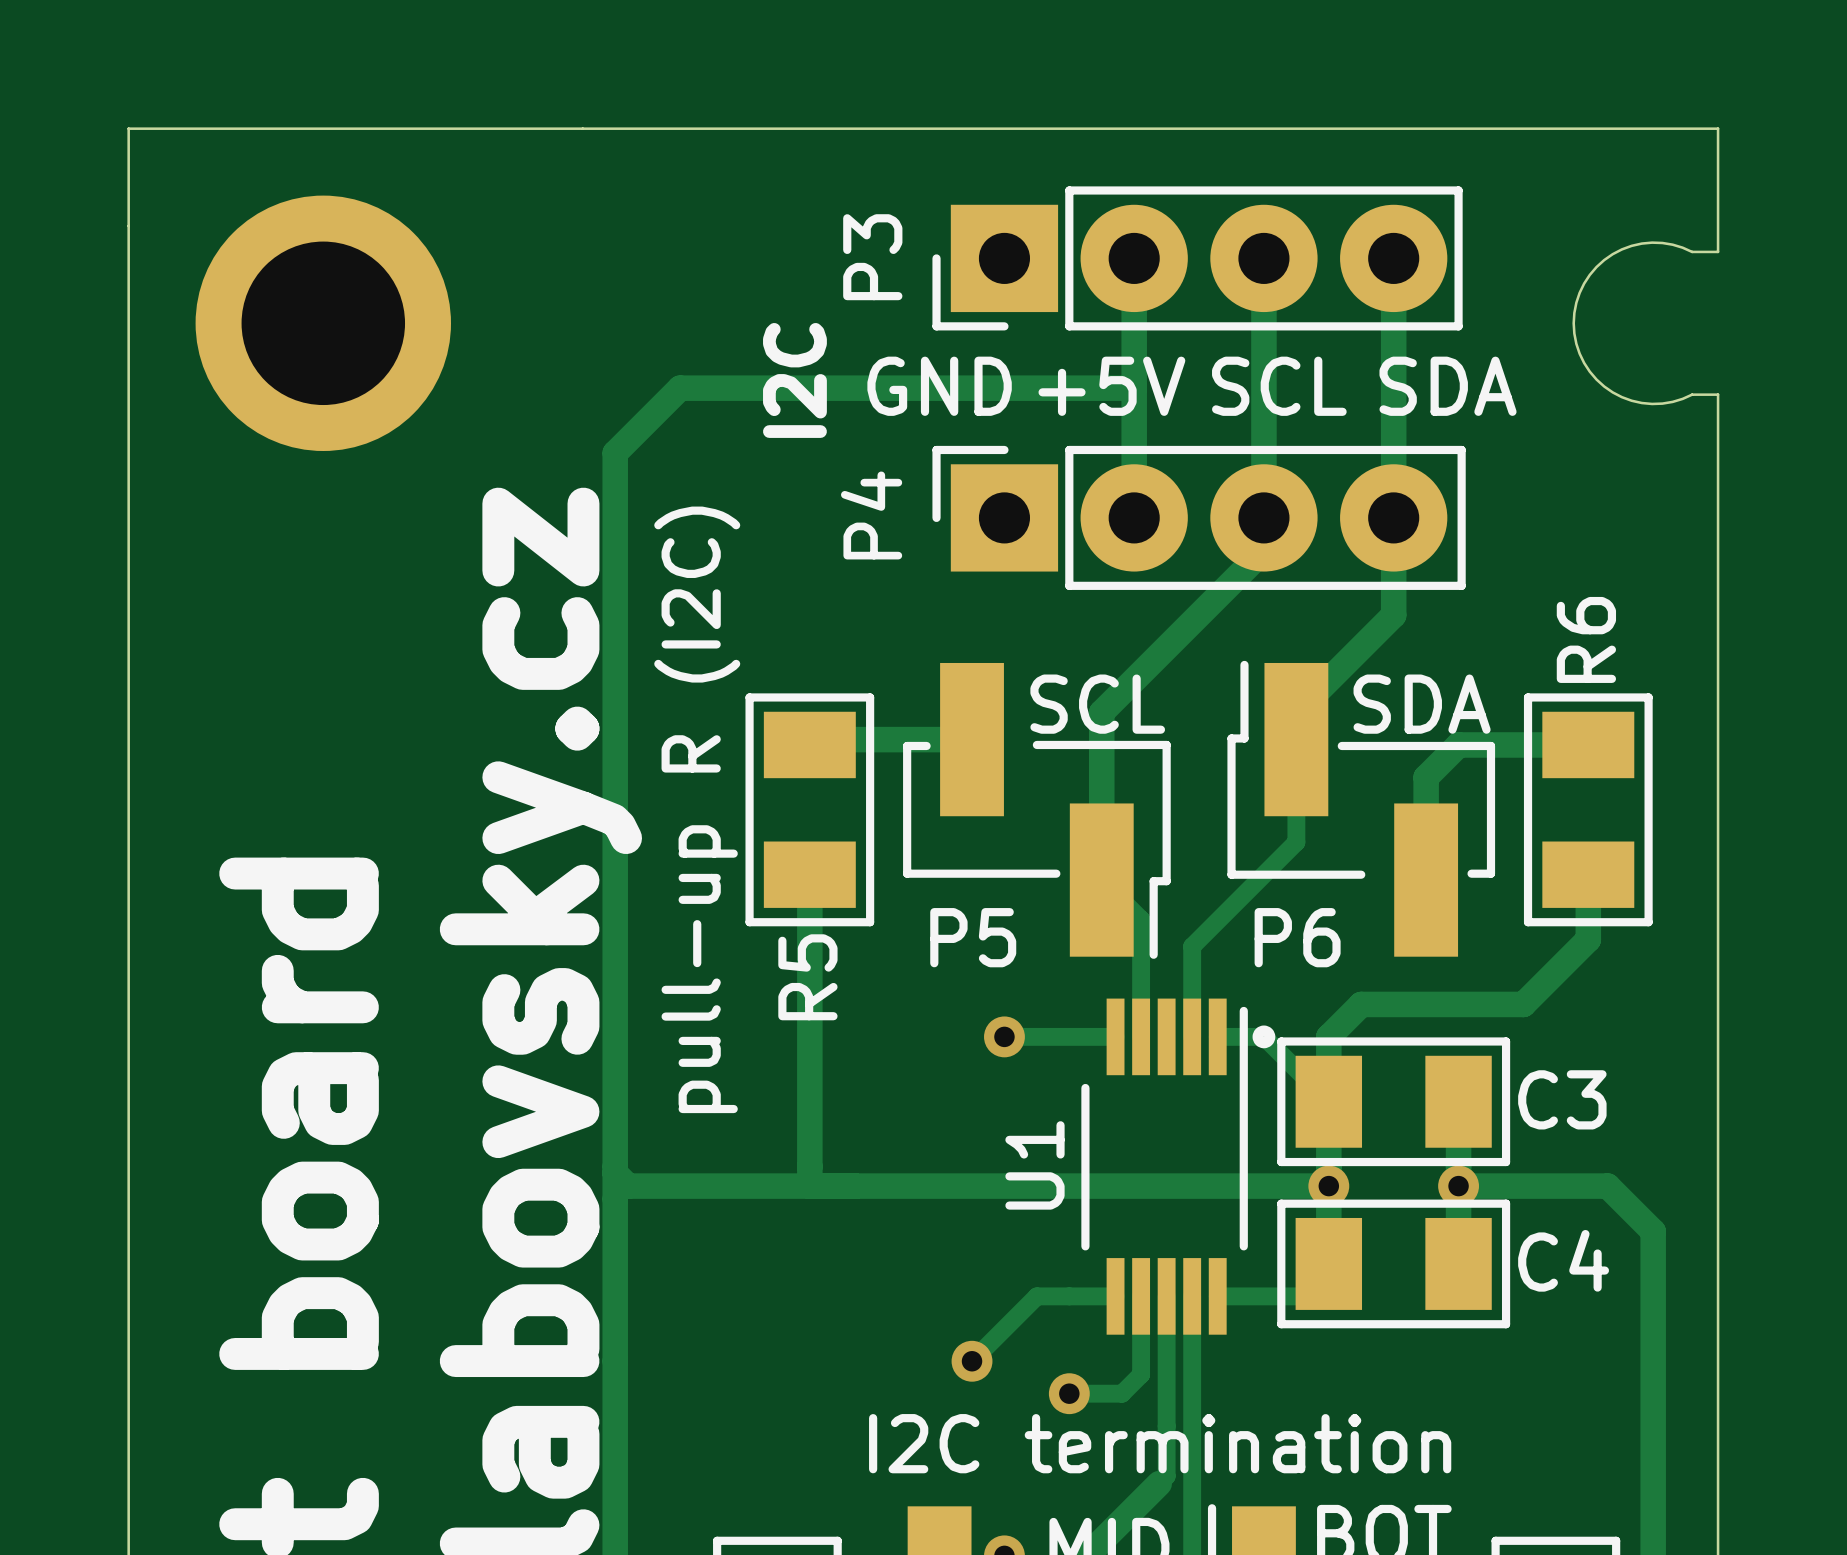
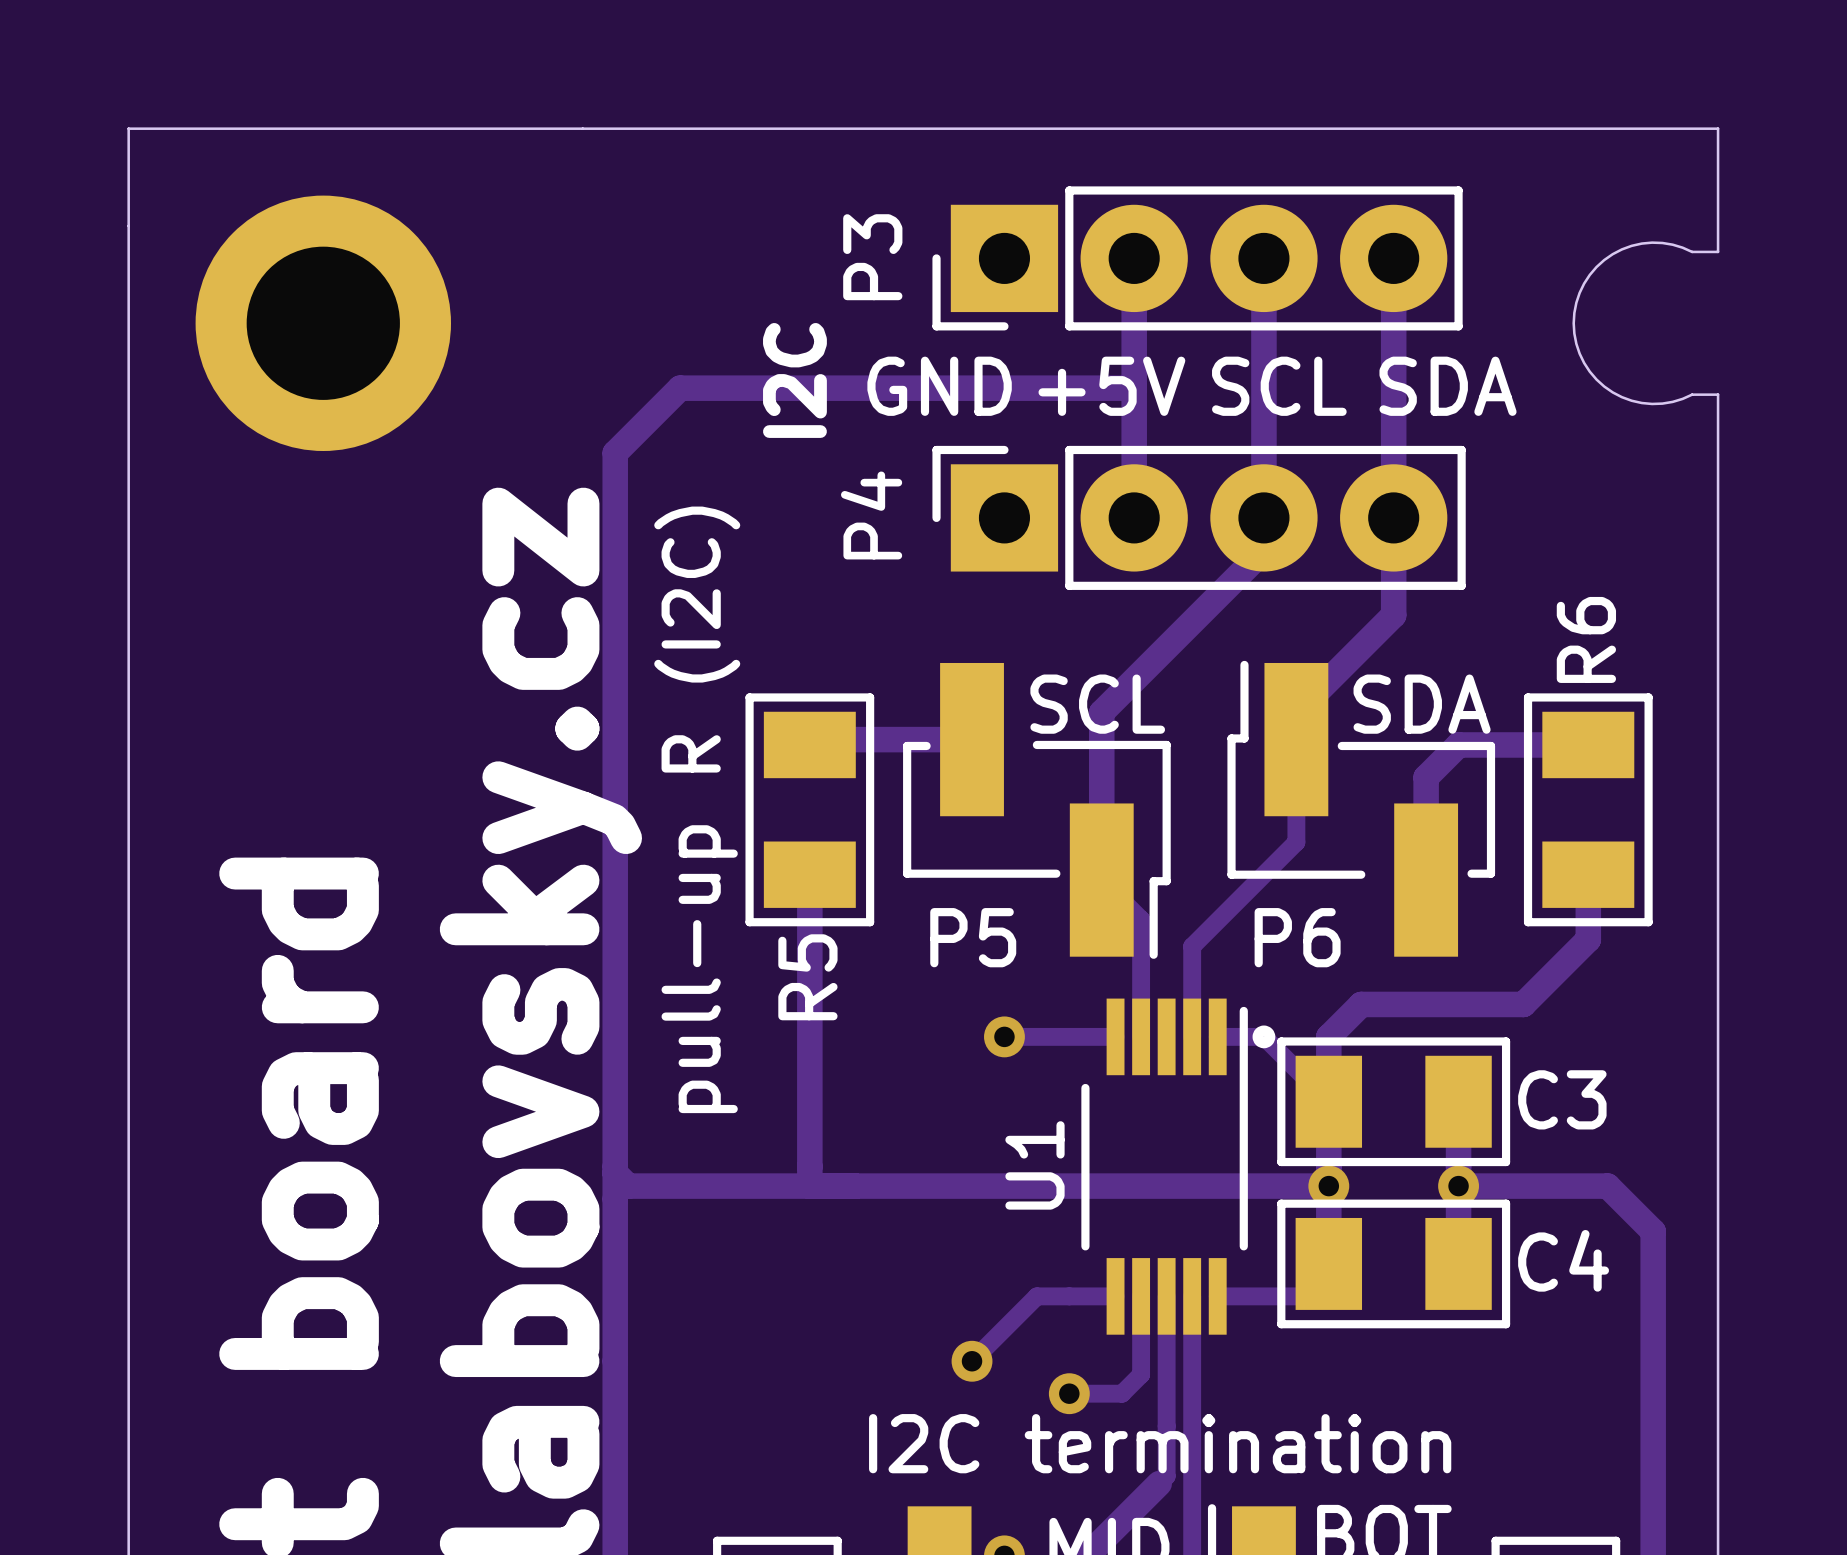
part footprint: [195, 195, 451, 451] -> [195, 195, 451, 451]

